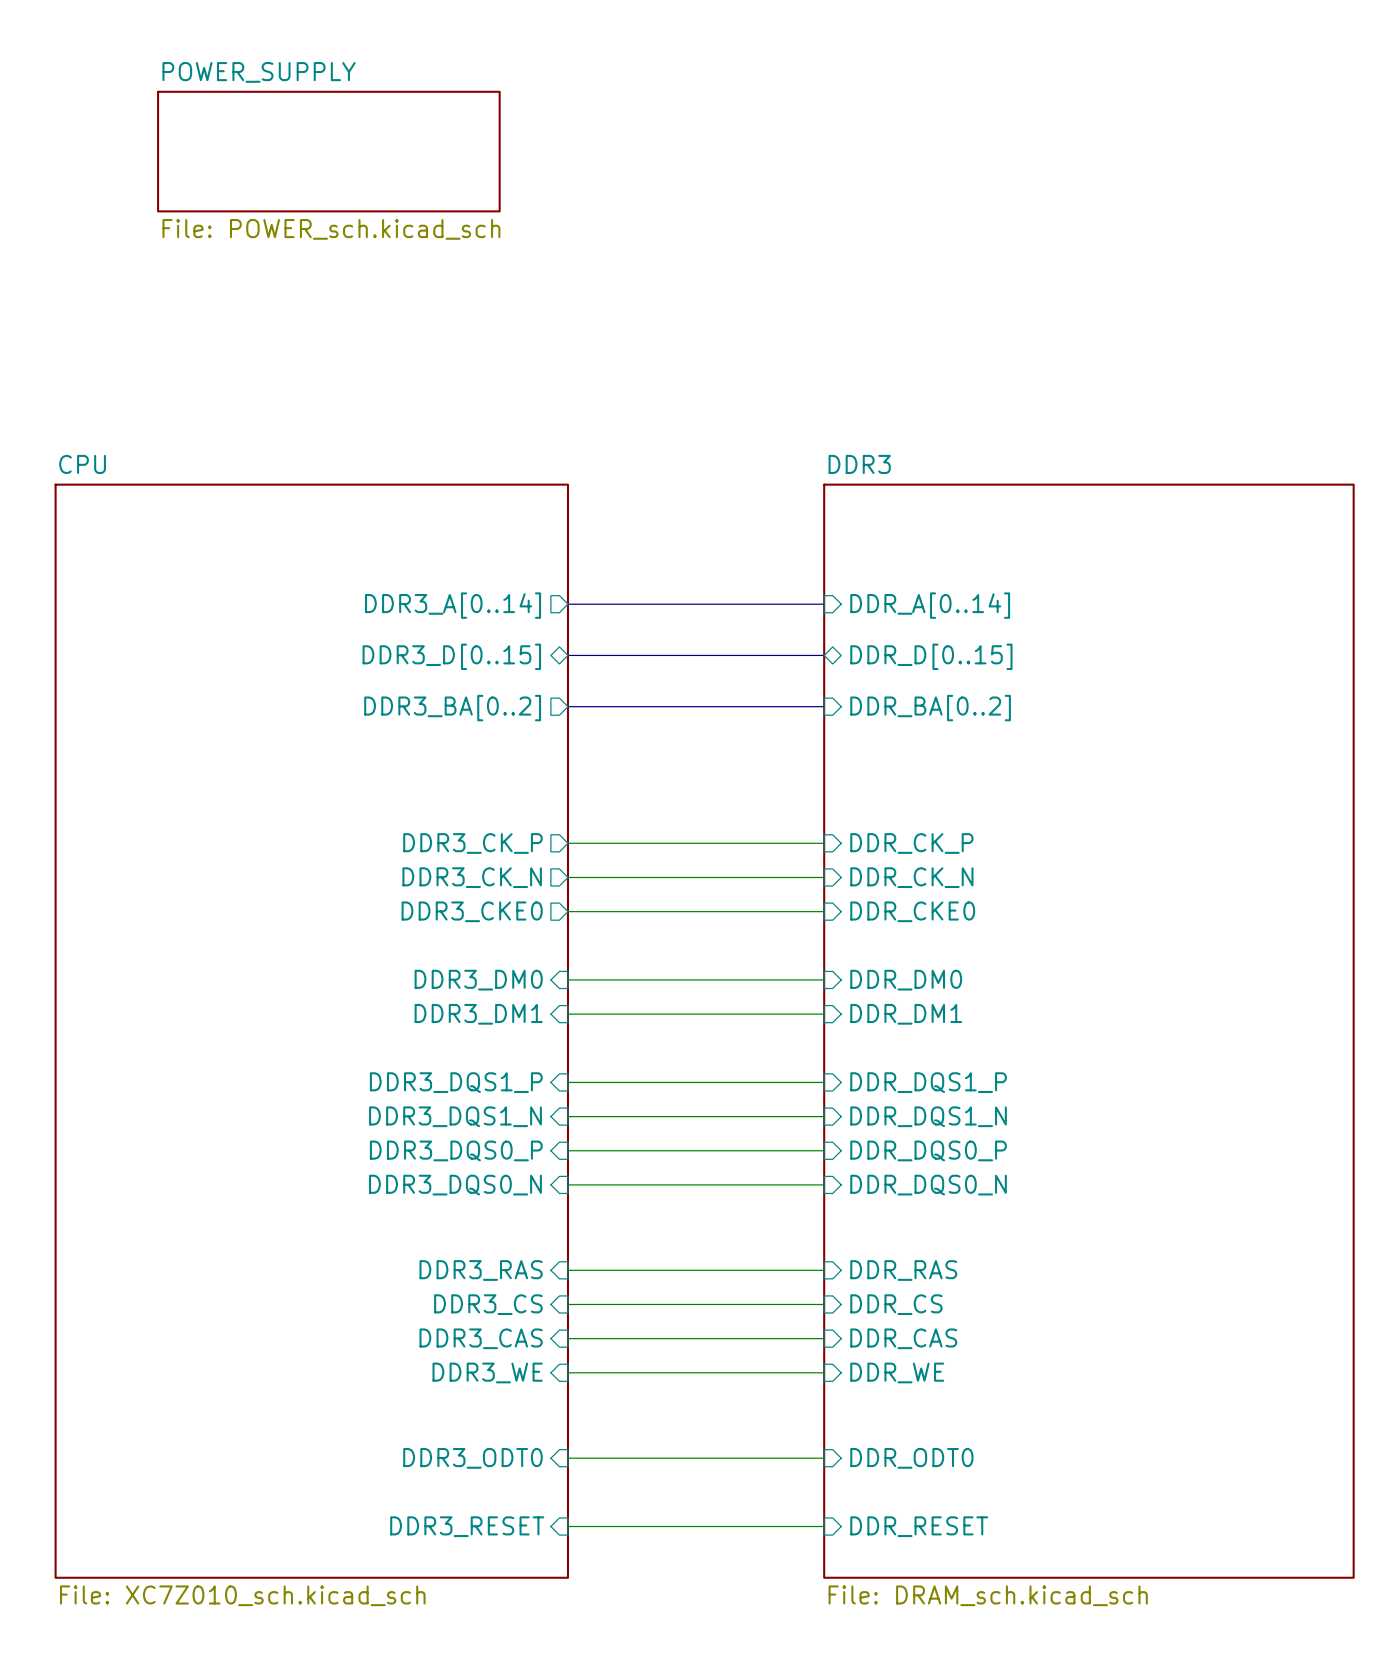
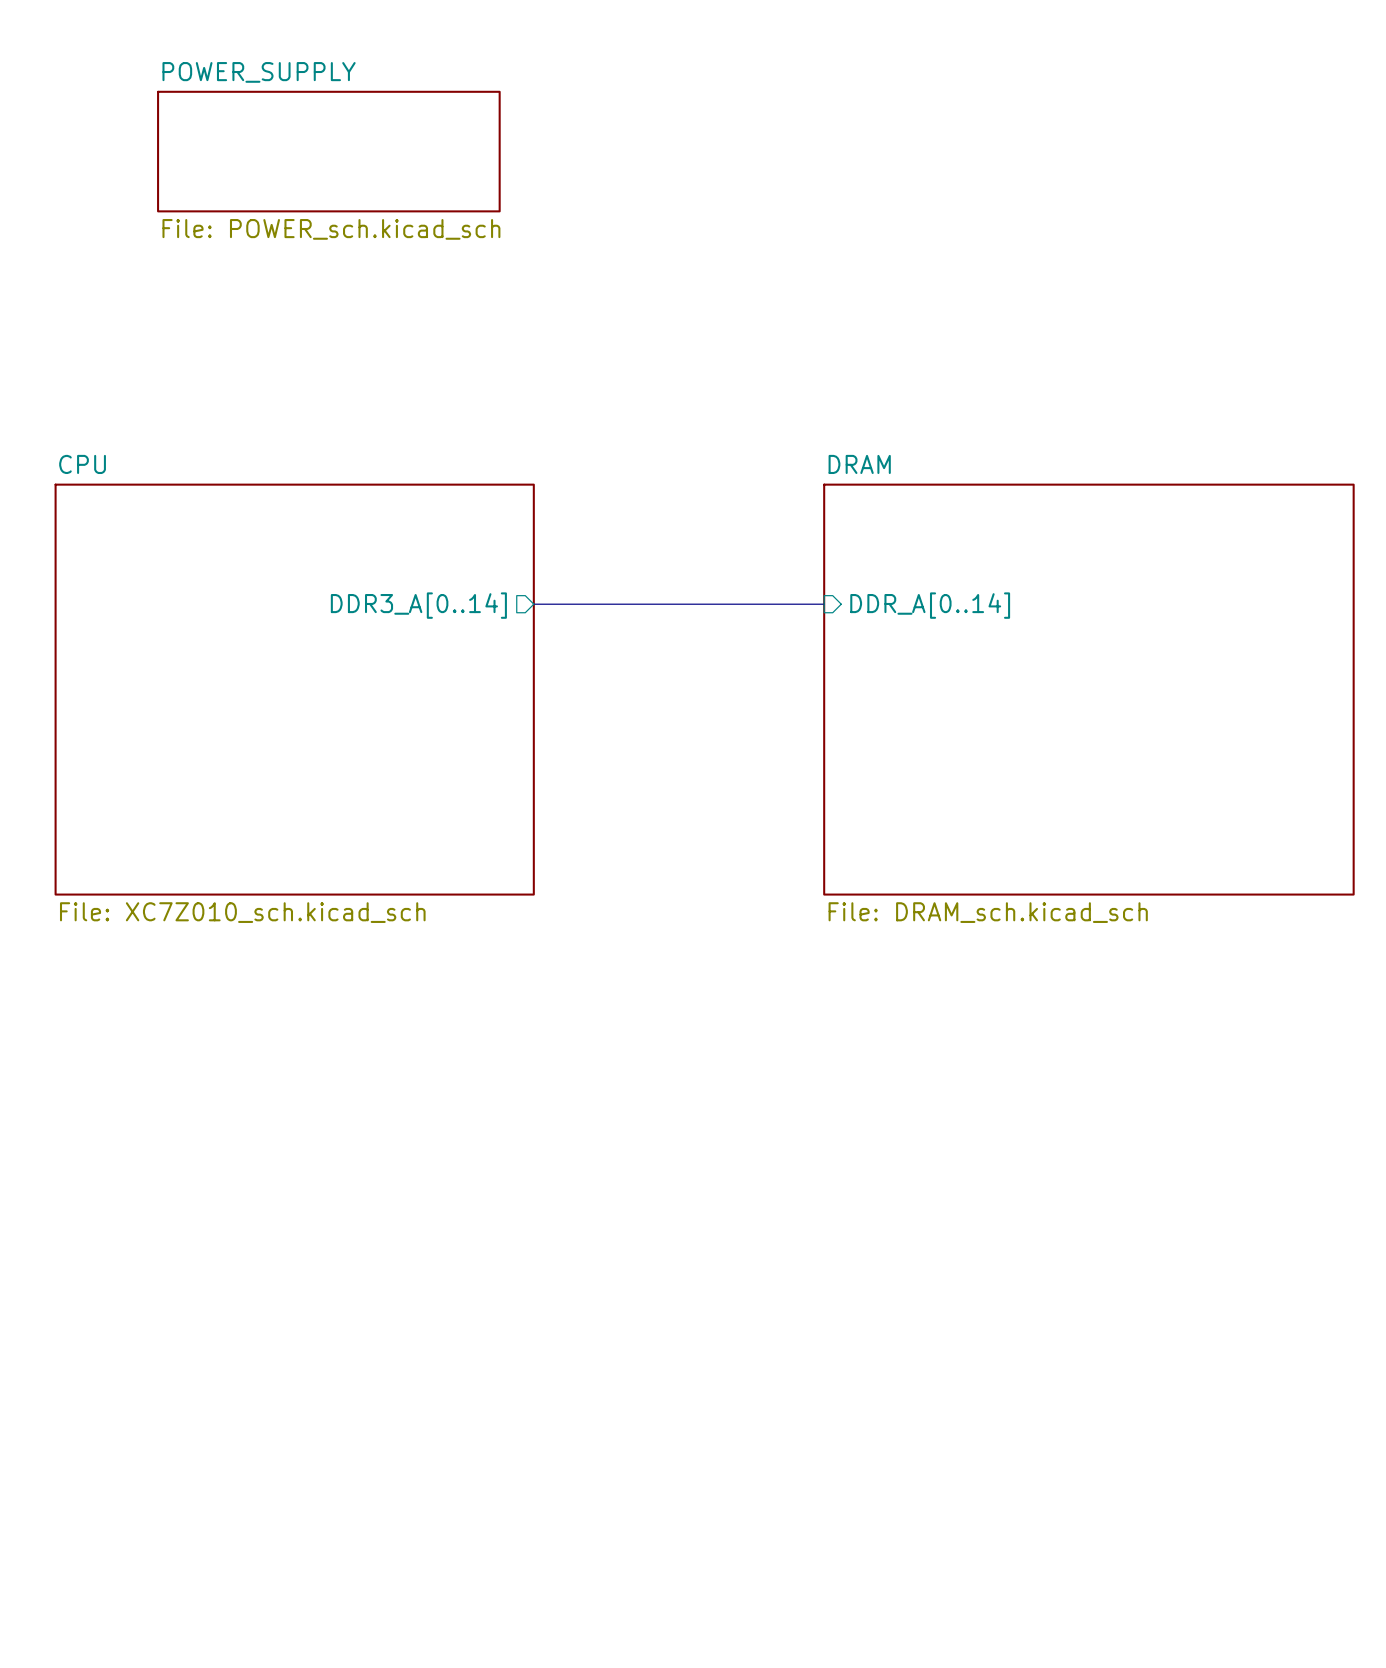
bus: none -> (533, 604) (567, 604)
sheet pin position: DDR3_A[0..14] (453, 605) -> DDR3_A[0..14] (418, 605)
bus: (567, 655) (824, 655) -> none
sheet pin: DDR3_D[0..15] (451, 656) -> none
sheet pin: DDR_D[0..15] (931, 656) -> none
sheet CPU: none -> File: XC7Z010_sch.kicad_sch (294, 689)
sheet DRAM: none -> File: DRAM_sch.kicad_sch (1088, 689)
bus: (567, 706) (824, 706) -> none
sheet pin: DDR3_BA[0..2] (452, 708) -> none
sheet pin: DDR_BA[0..2] (930, 708) -> none
sheet pin: DDR3_CK_P (472, 843) -> none
wire: (567, 843) (824, 843) -> none
sheet pin: DDR_CK_P (911, 843) -> none
sheet pin: DDR3_CK_N (472, 877) -> none
wire: (567, 877) (824, 877) -> none
sheet pin: DDR_CK_N (911, 877) -> none
sheet pin: DDR3_CKE0 (472, 911) -> none
wire: (567, 911) (824, 911) -> none
sheet pin: DDR_CKE0 (912, 911) -> none
wire: (567, 979) (824, 979) -> none
sheet pin: DDR3_DM0 (478, 980) -> none
sheet pin: DDR_DM0 (906, 980) -> none
sheet pin: DDR3_DM1 (478, 1014) -> none
wire: (567, 1014) (824, 1014) -> none
sheet pin: DDR_DM1 (906, 1014) -> none
sheet CPU: File: XC7Z010_sch.kicad_sch (311, 1031) -> none
sheet DDR3: File: DRAM_sch.kicad_sch (1088, 1031) -> none
sheet pin: DDR3_DQS1_P (456, 1082) -> none
wire: (567, 1082) (824, 1082) -> none
sheet pin: DDR_DQS1_P (928, 1082) -> none
sheet pin: DDR3_DQS1_N (455, 1116) -> none
wire: (567, 1116) (824, 1116) -> none
sheet pin: DDR_DQS1_N (928, 1116) -> none
sheet pin: DDR3_DQS0_P (456, 1150) -> none
wire: (567, 1150) (824, 1150) -> none
sheet pin: DDR_DQS0_P (928, 1150) -> none
wire: (567, 1184) (824, 1184) -> none
sheet pin: DDR3_DQS0_N (455, 1185) -> none
sheet pin: DDR_DQS0_N (928, 1185) -> none
sheet pin: DDR3_RAS (481, 1270) -> none
wire: (567, 1270) (824, 1270) -> none
sheet pin: DDR_RAS (903, 1270) -> none
sheet pin: DDR3_CS (488, 1304) -> none
wire: (567, 1304) (824, 1304) -> none
sheet pin: DDR_CS (896, 1304) -> none
sheet pin: DDR3_CAS (481, 1338) -> none
wire: (567, 1338) (824, 1338) -> none
sheet pin: DDR_CAS (903, 1338) -> none
sheet pin: DDR3_WE (487, 1372) -> none
wire: (567, 1372) (824, 1372) -> none
sheet pin: DDR_WE (897, 1372) -> none
sheet pin: DDR3_ODT0 (472, 1458) -> none
wire: (567, 1458) (824, 1458) -> none
sheet pin: DDR_ODT0 (911, 1458) -> none
sheet pin: DDR3_RESET (467, 1526) -> none
wire: (567, 1526) (824, 1526) -> none
sheet pin: DDR_RESET (919, 1526) -> none

